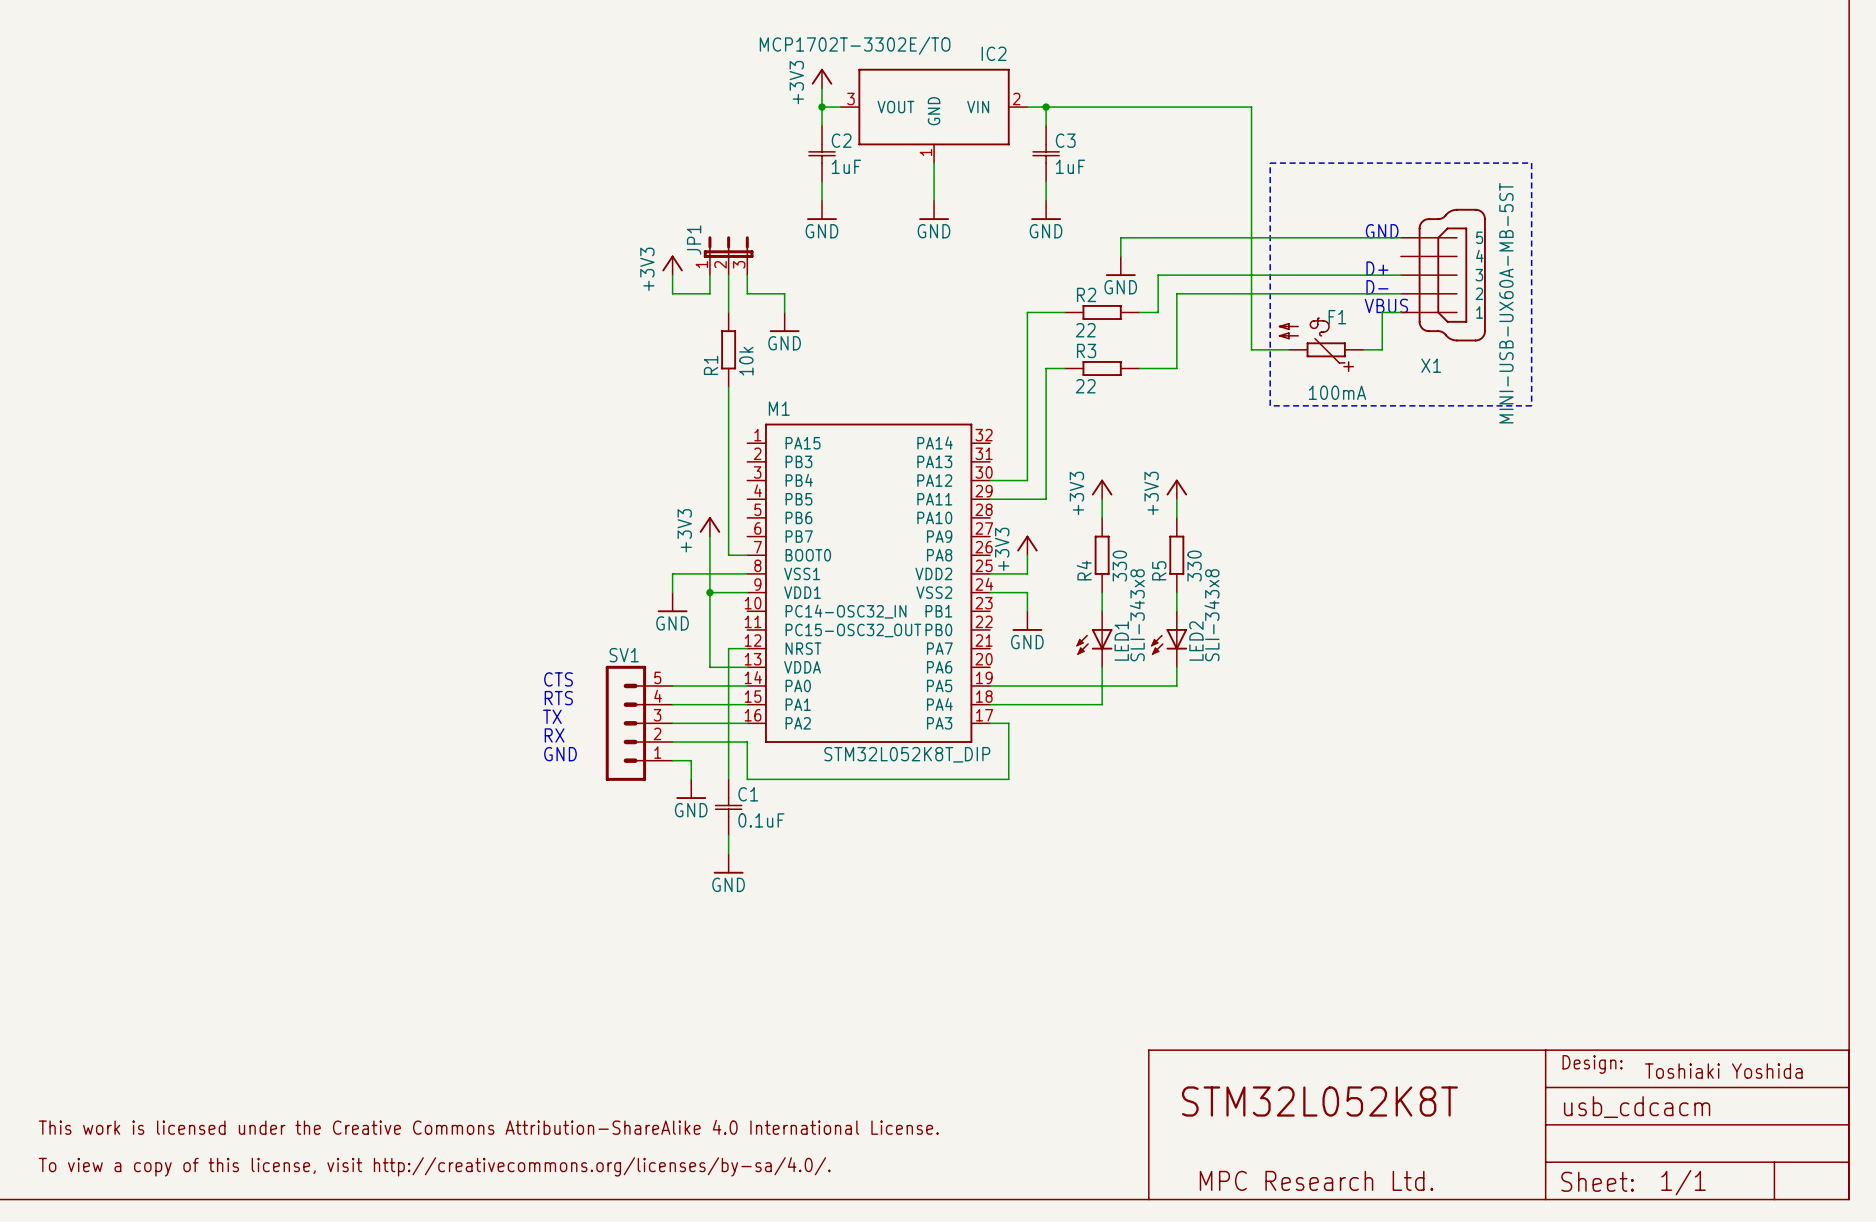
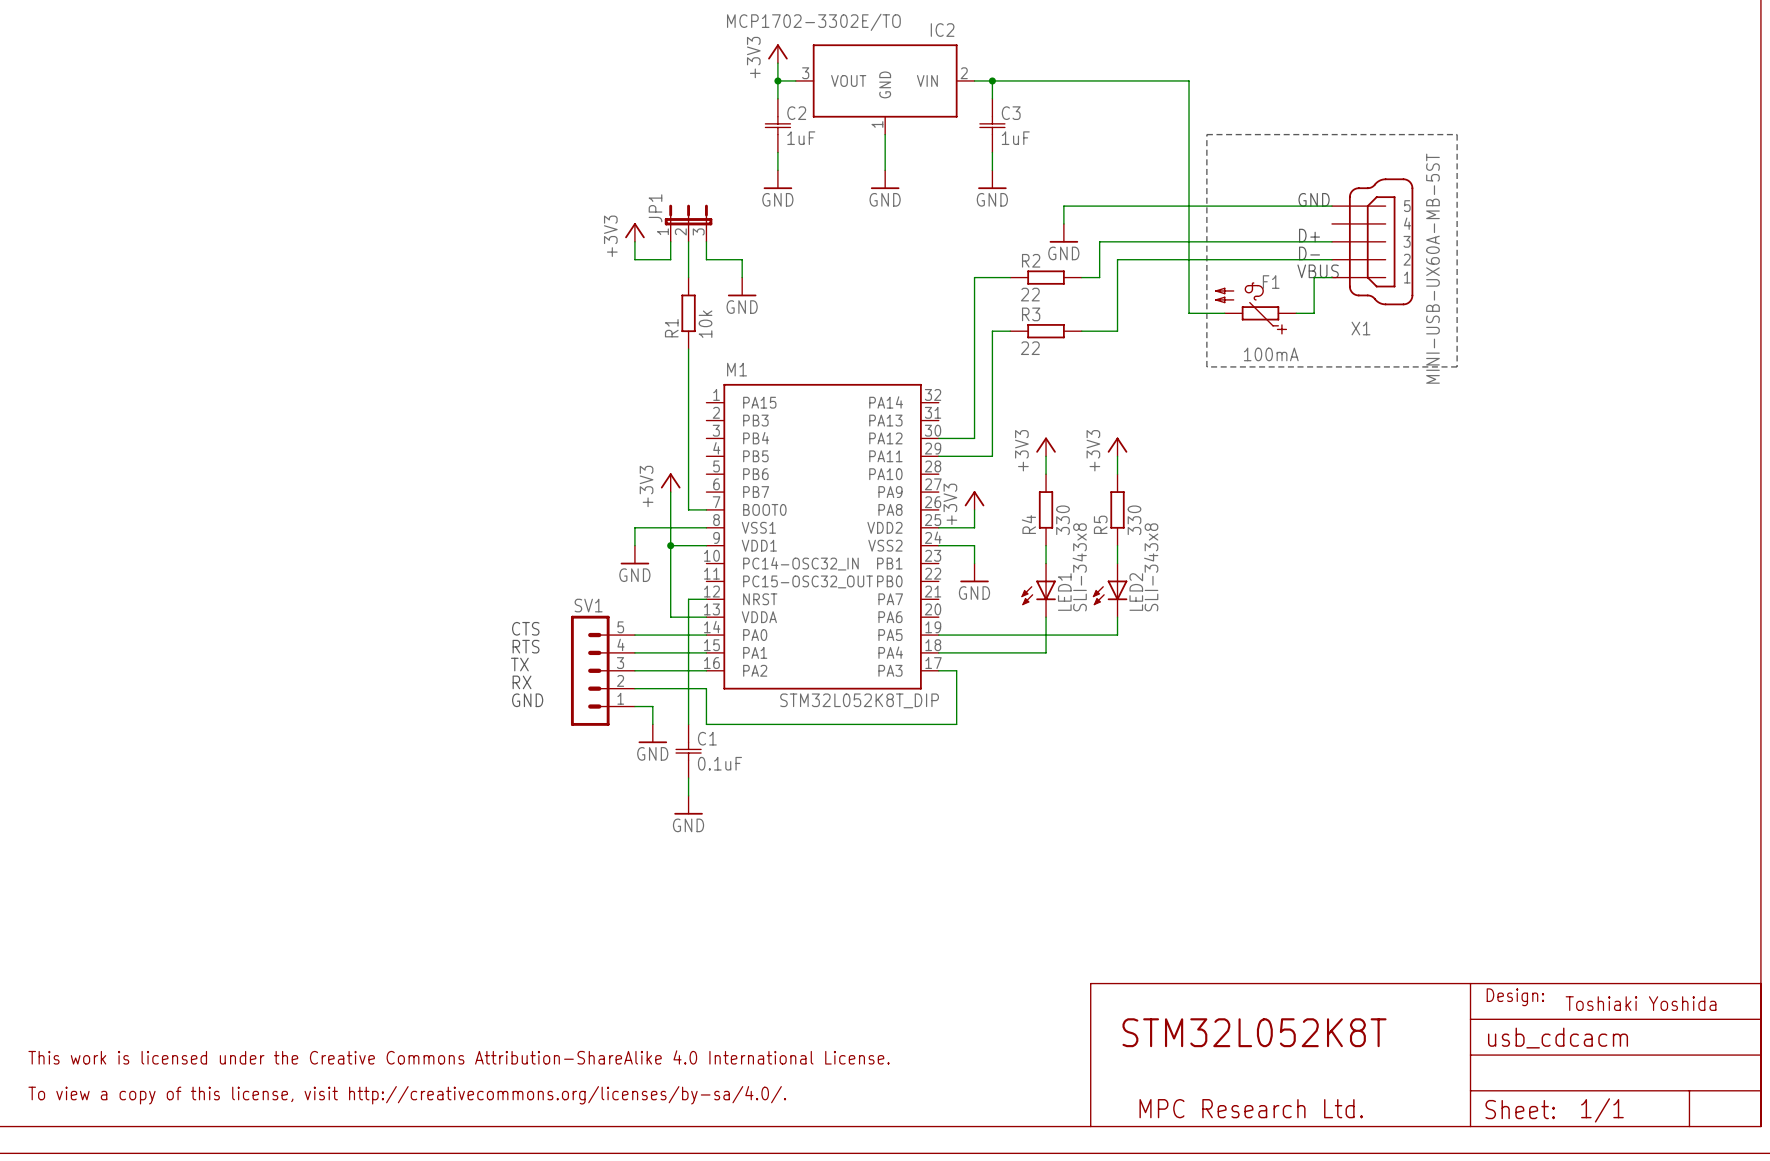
IC2 value: MCP1702T-3302E/TO (855, 45) -> MCP1702-3302E/TO (813, 22)

